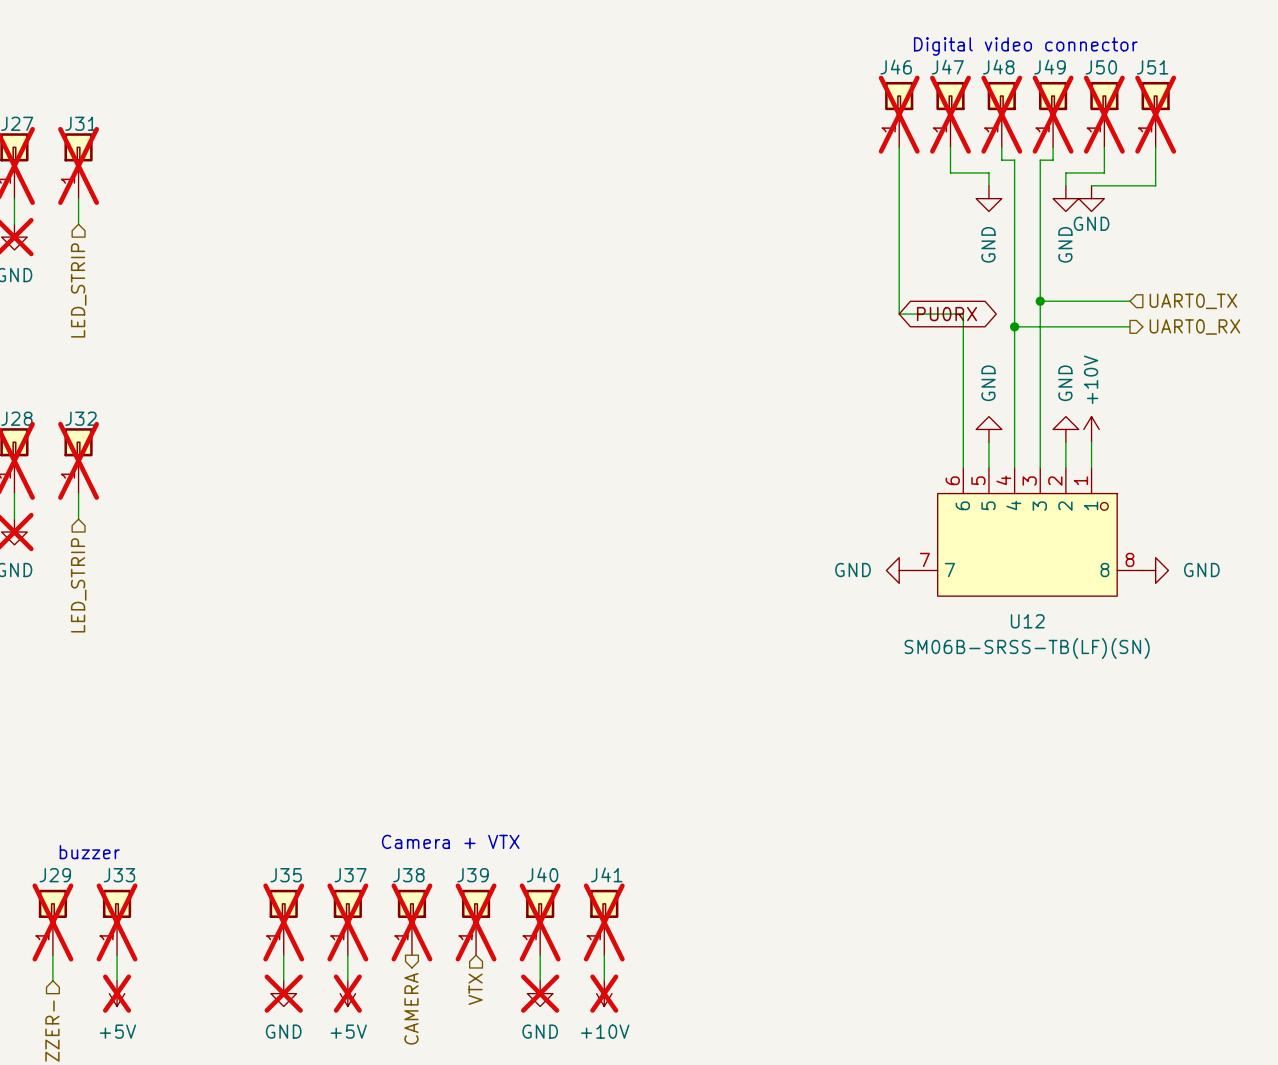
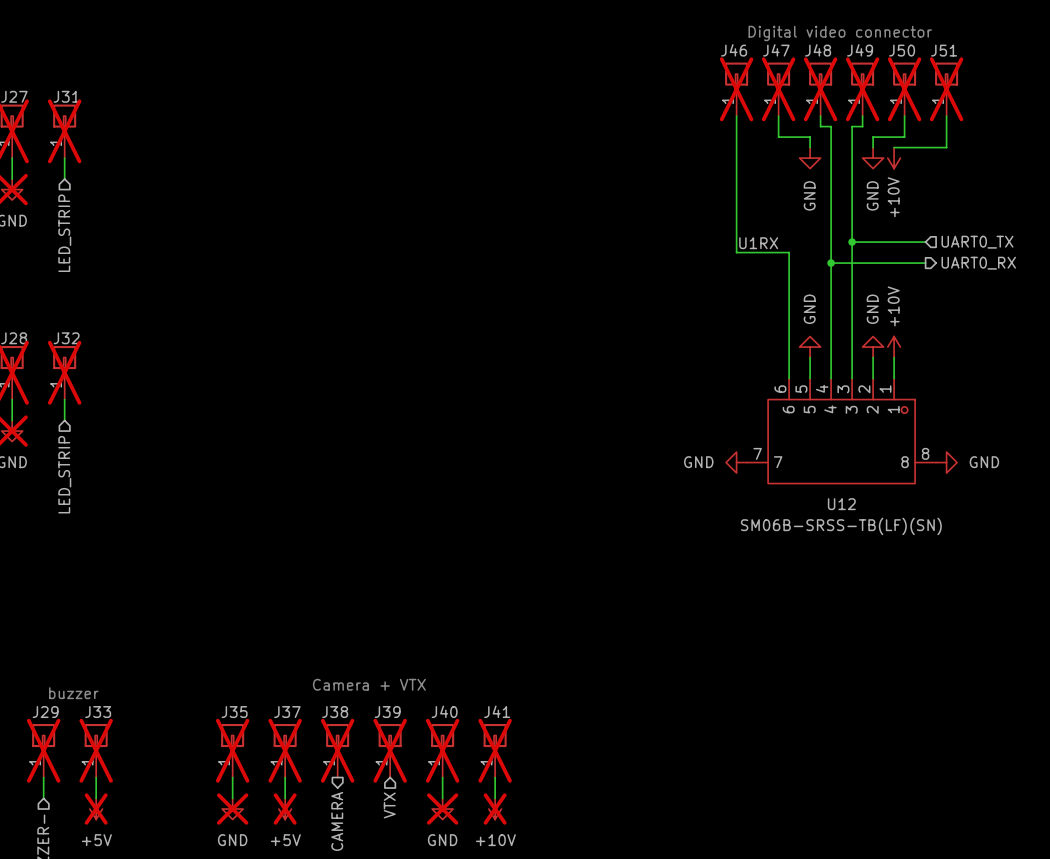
power symbol: GND (1091, 198) -> +10V (894, 158)
label: none -> U1RX (758, 243)
global label: PU0RX (947, 314) -> none

